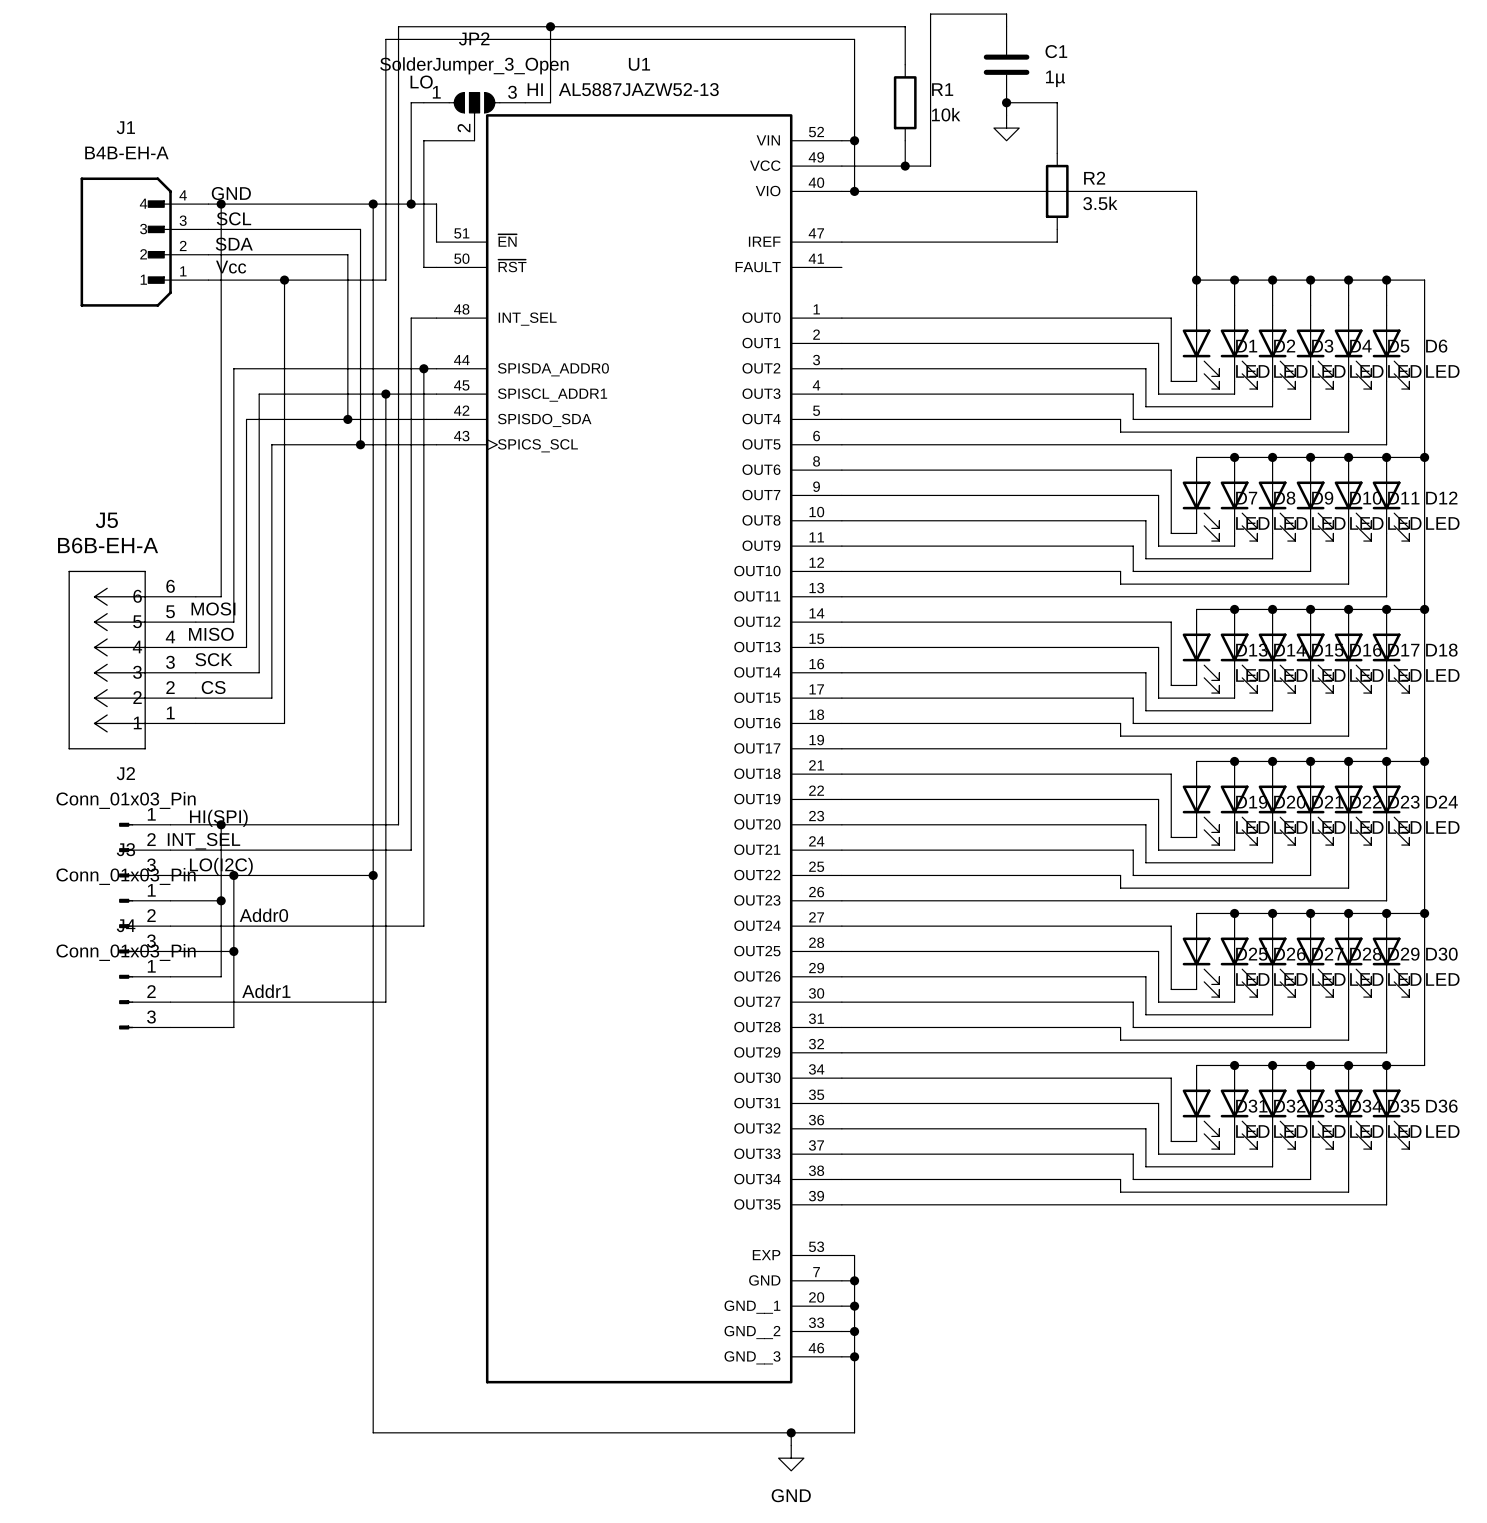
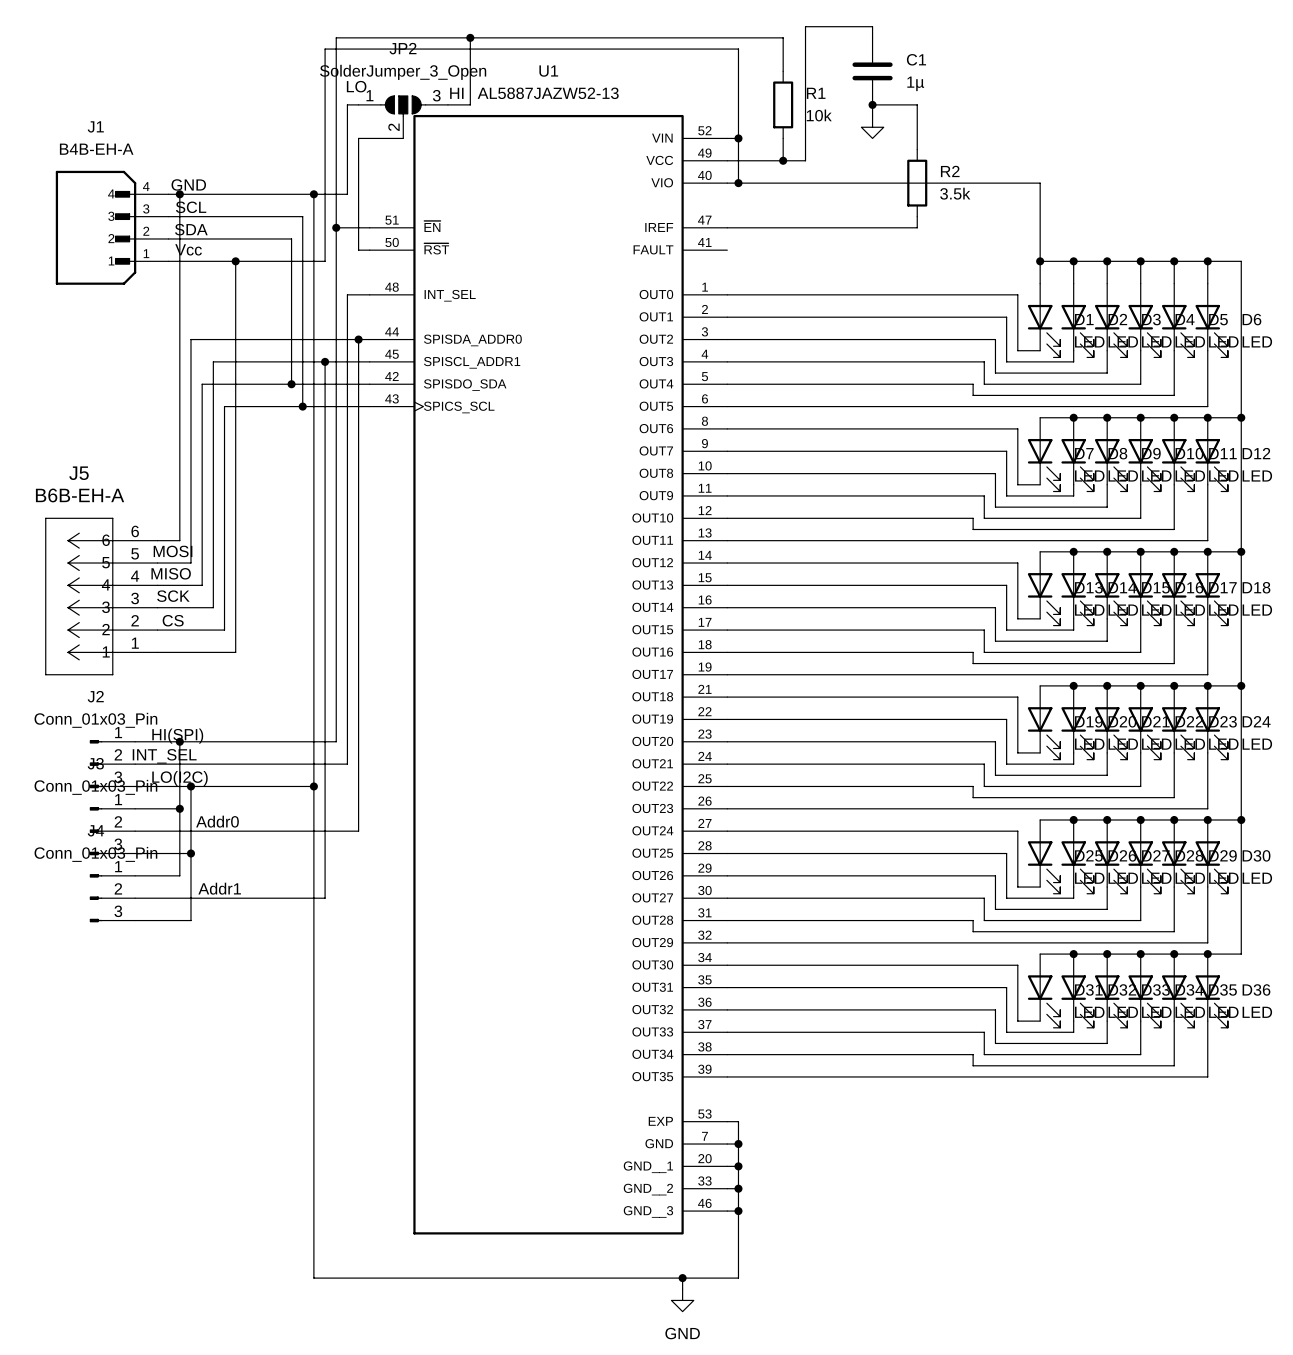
wire: (411, 204) (436, 204) (436, 242) -> (336, 227) (369, 227)
junction position: (411, 204) -> (336, 227)

